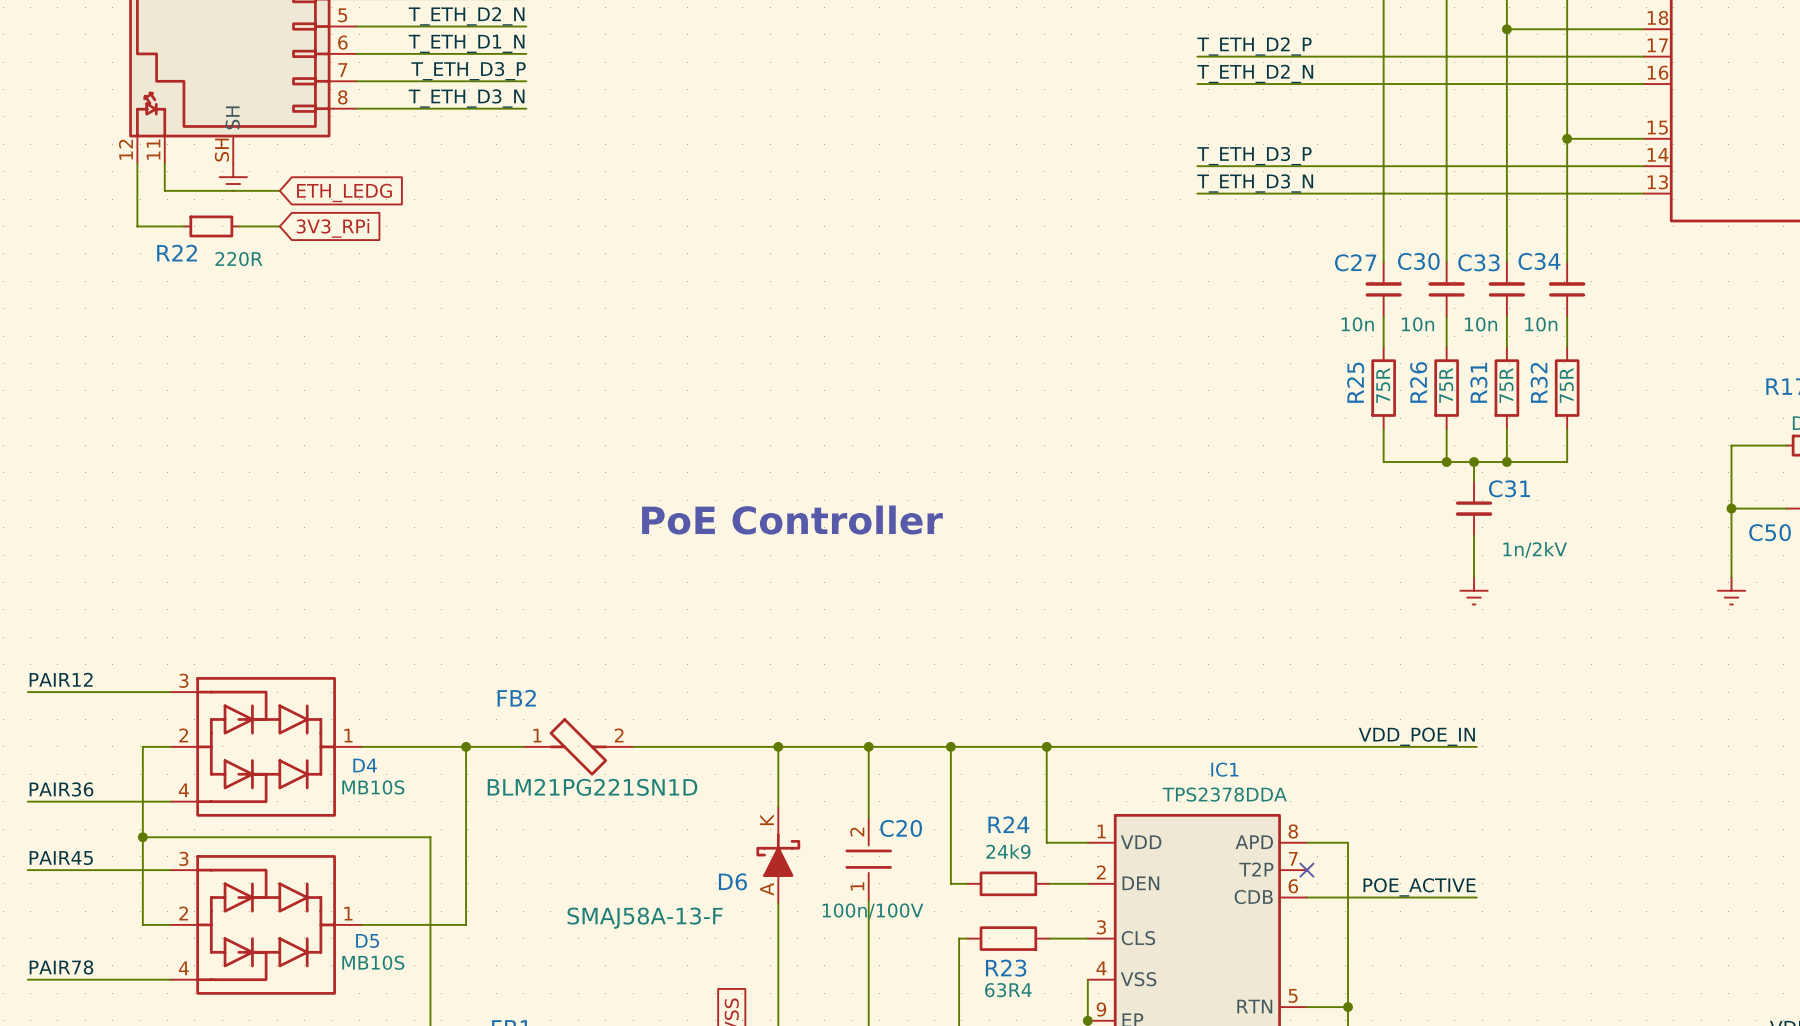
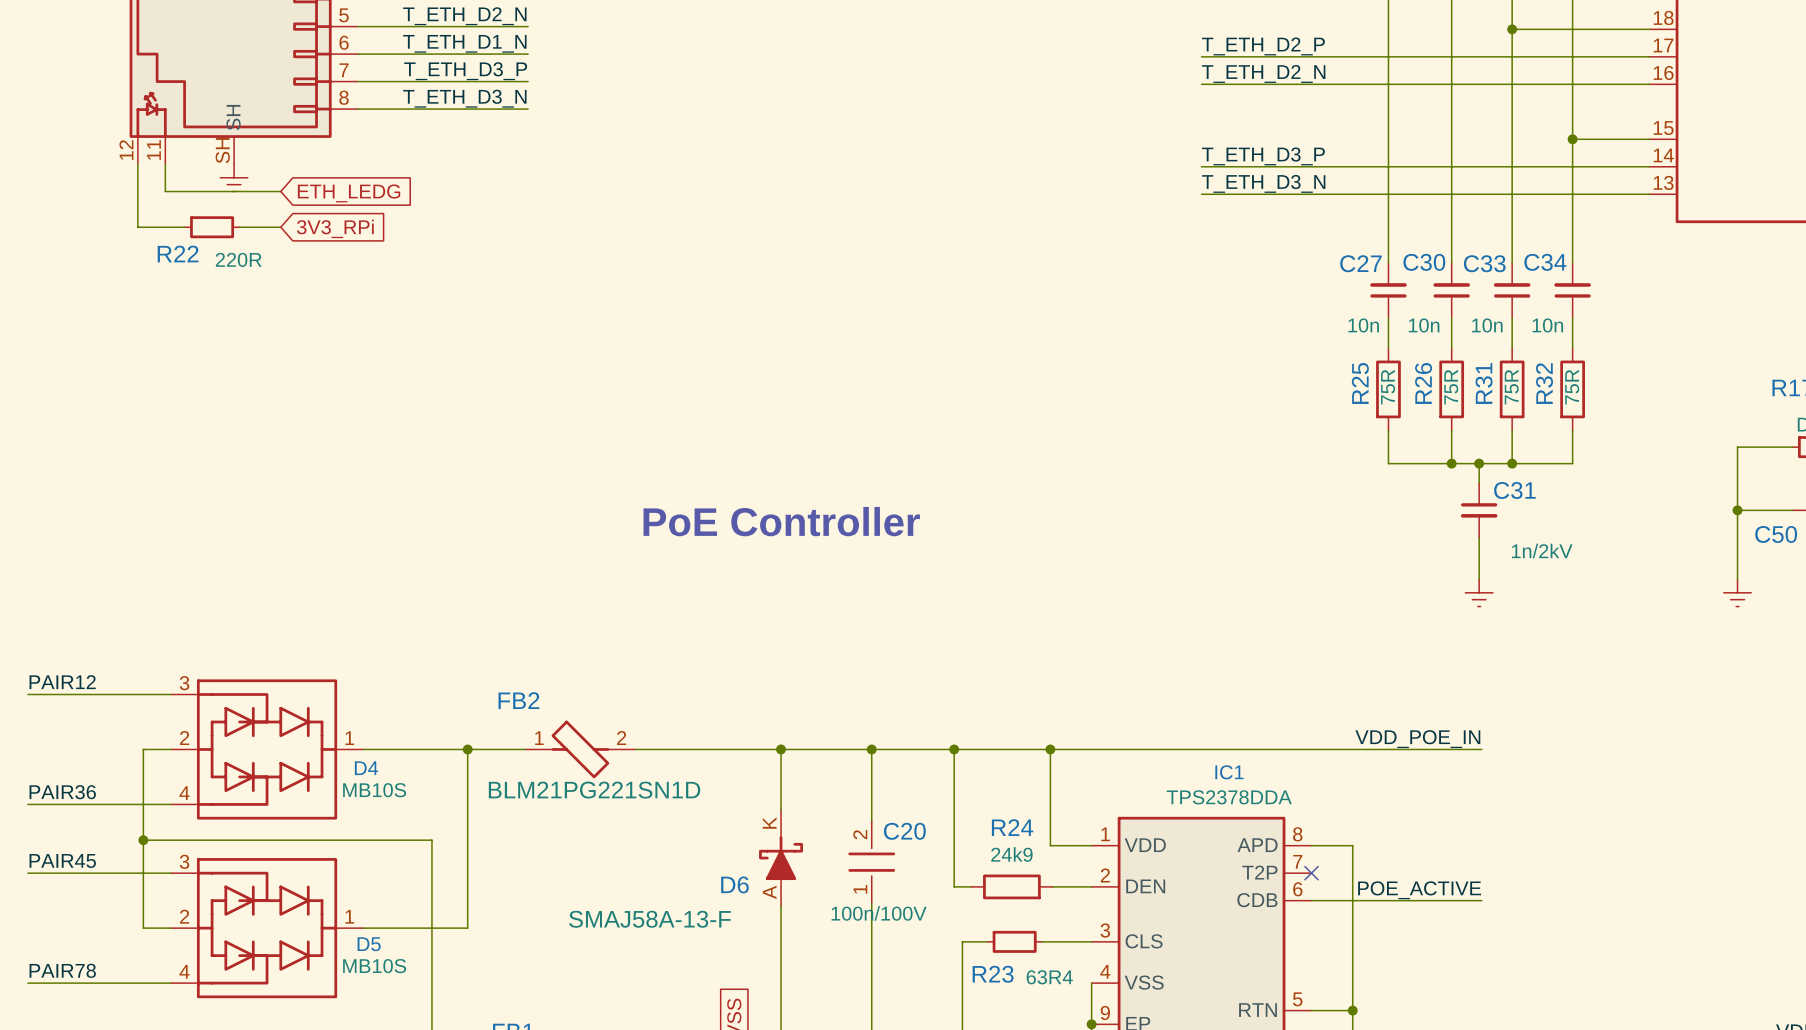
R23 symbol: [967, 926, 1050, 951] -> [987, 930, 1043, 953]
R23 text position: 63R4 (1008, 990) -> 63R4 (1049, 977)

